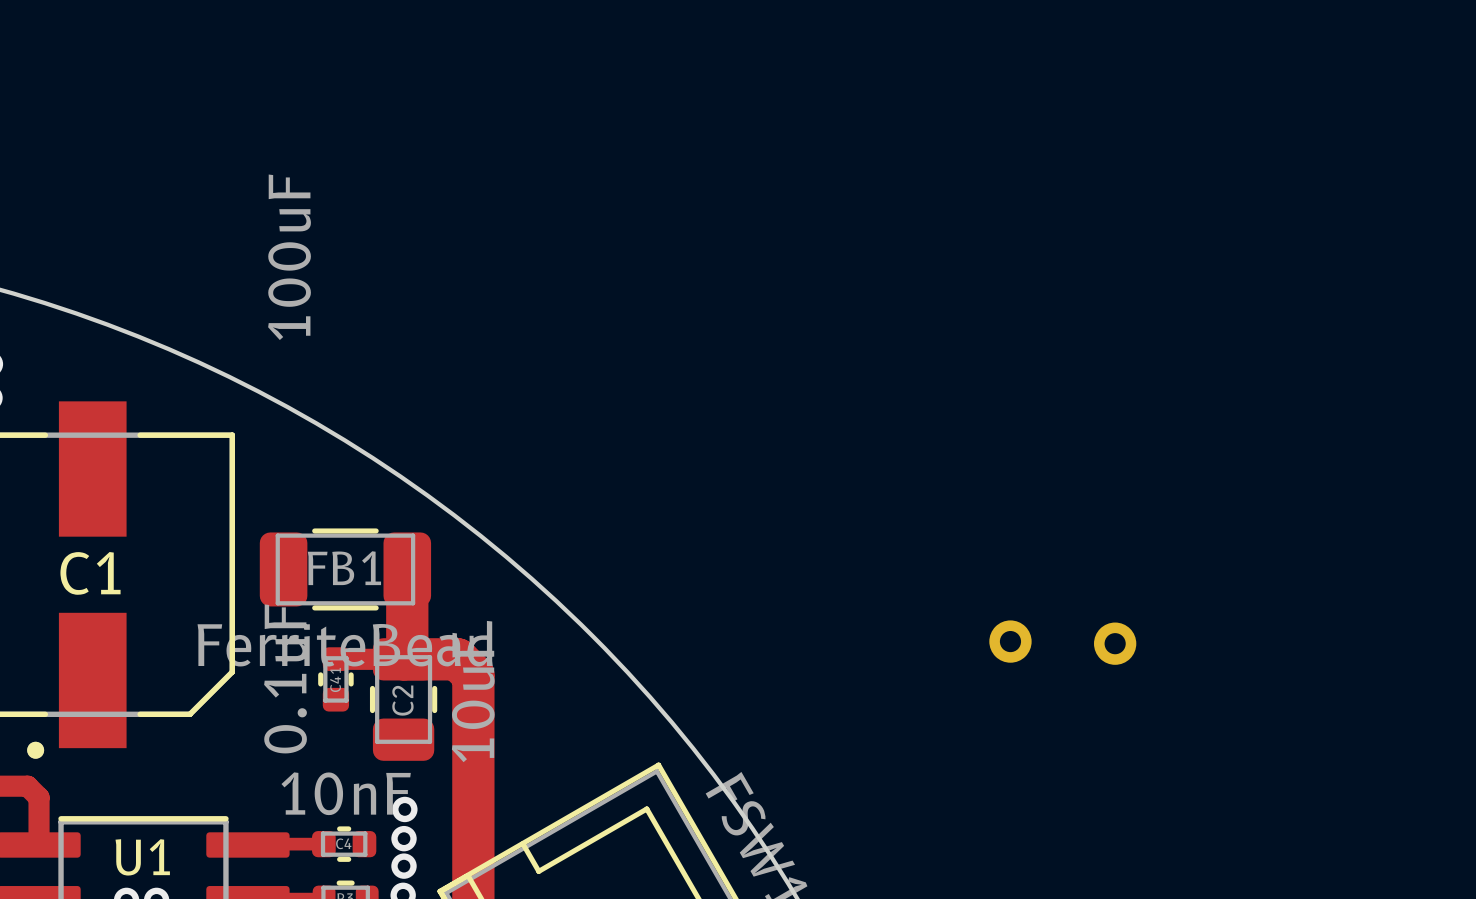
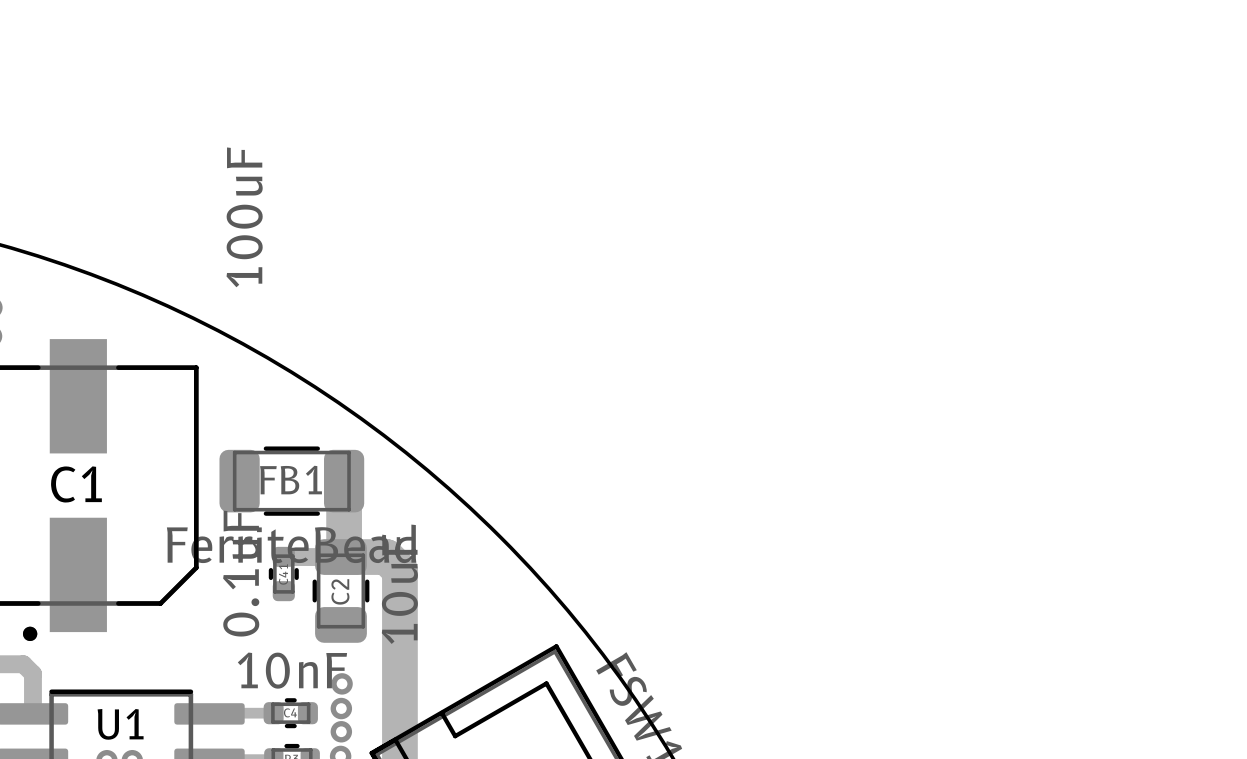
part: (1010, 641) -> none
part: (1115, 643) -> none

